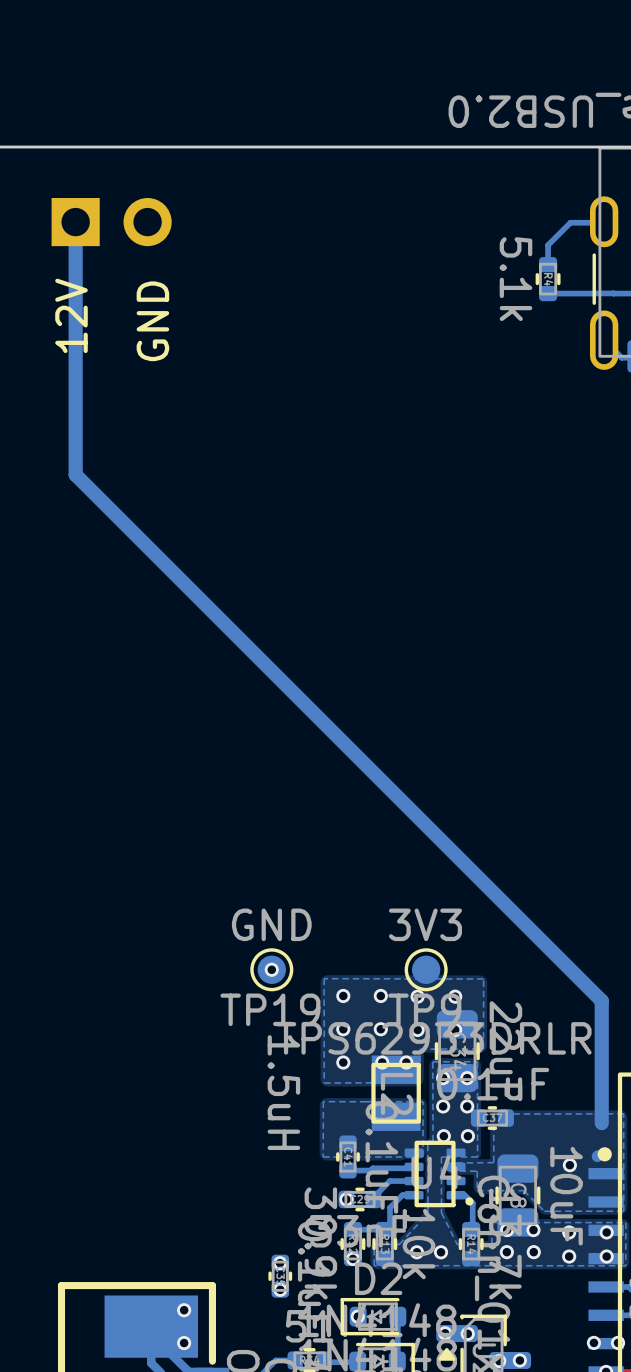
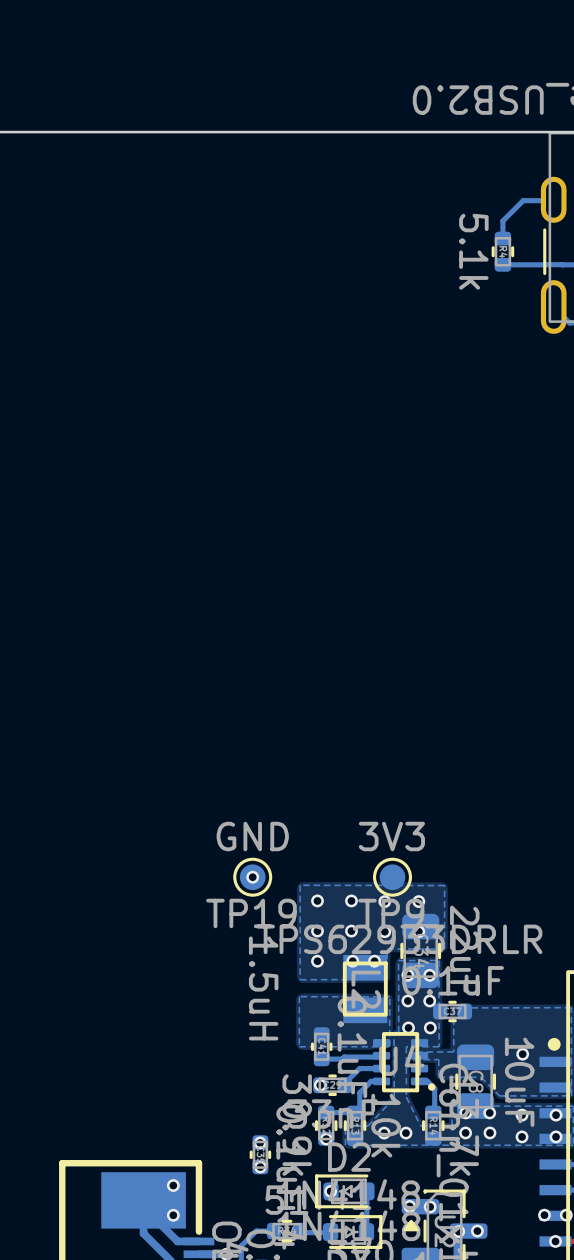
bottom track: (75, 222) (75, 474) (601, 1000) (601, 1123) -> none
part: (111, 222) -> none
text: 12V (71, 315) -> none
text: GND (152, 321) -> none
bottom track: (597, 1155) (597, 1156) -> none

